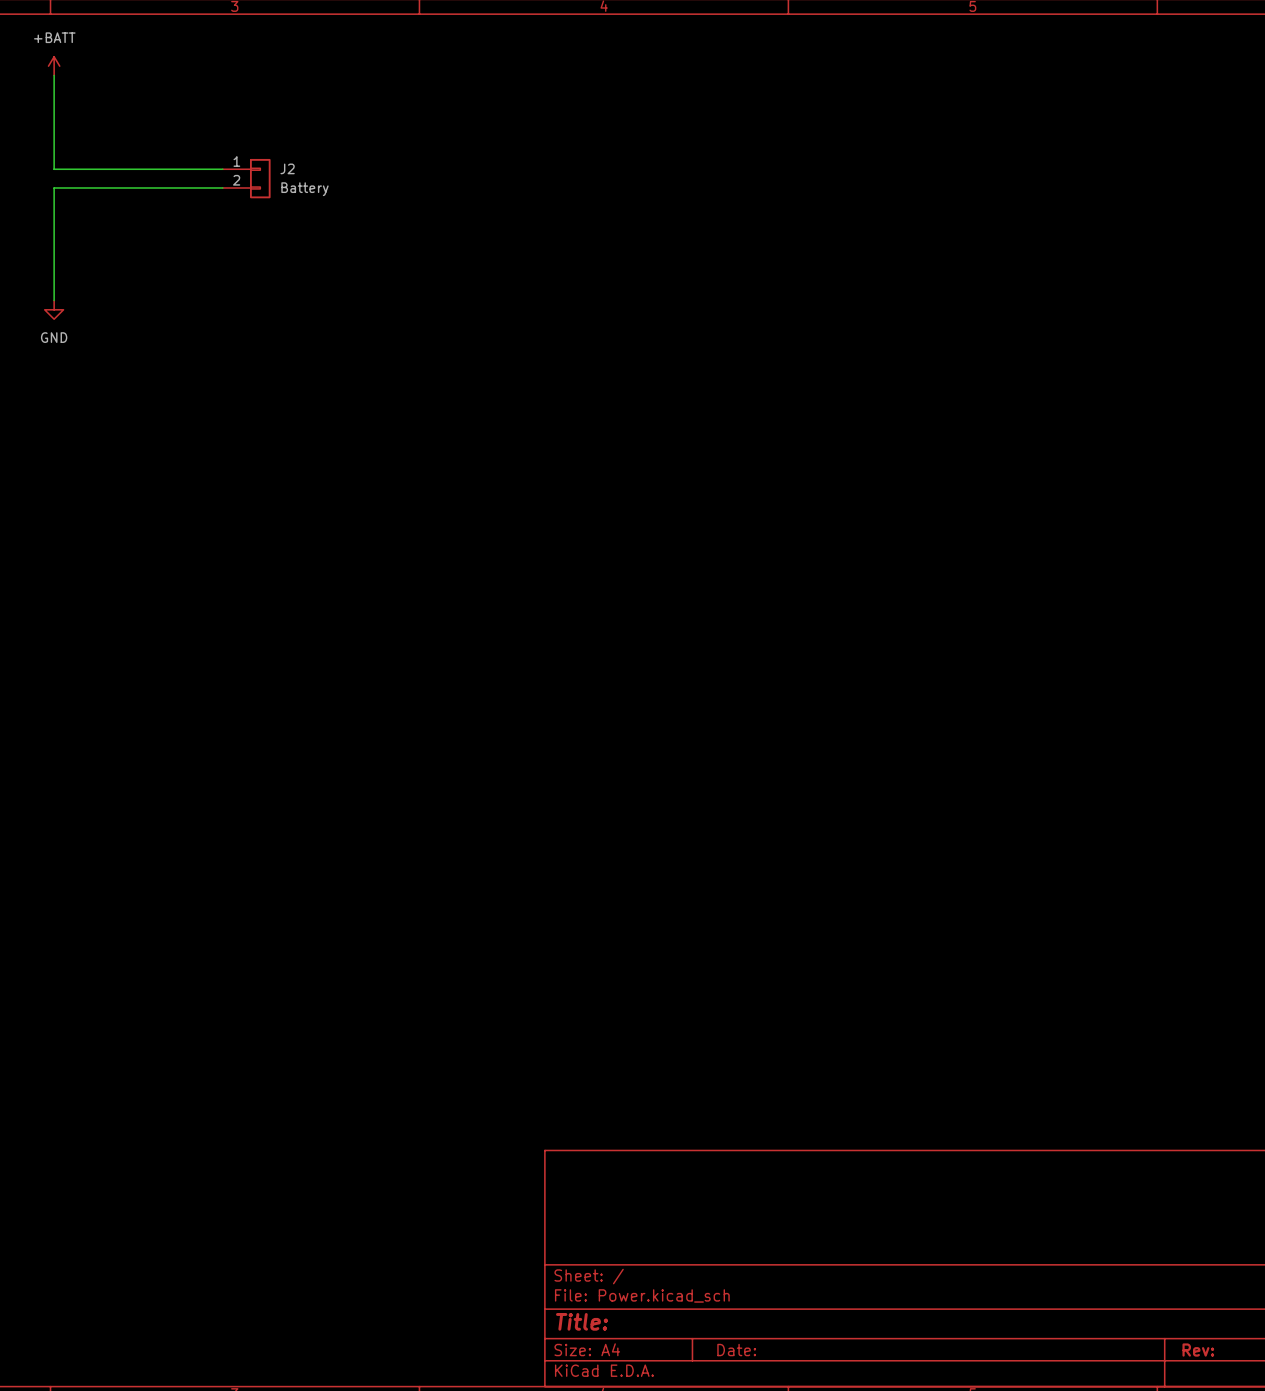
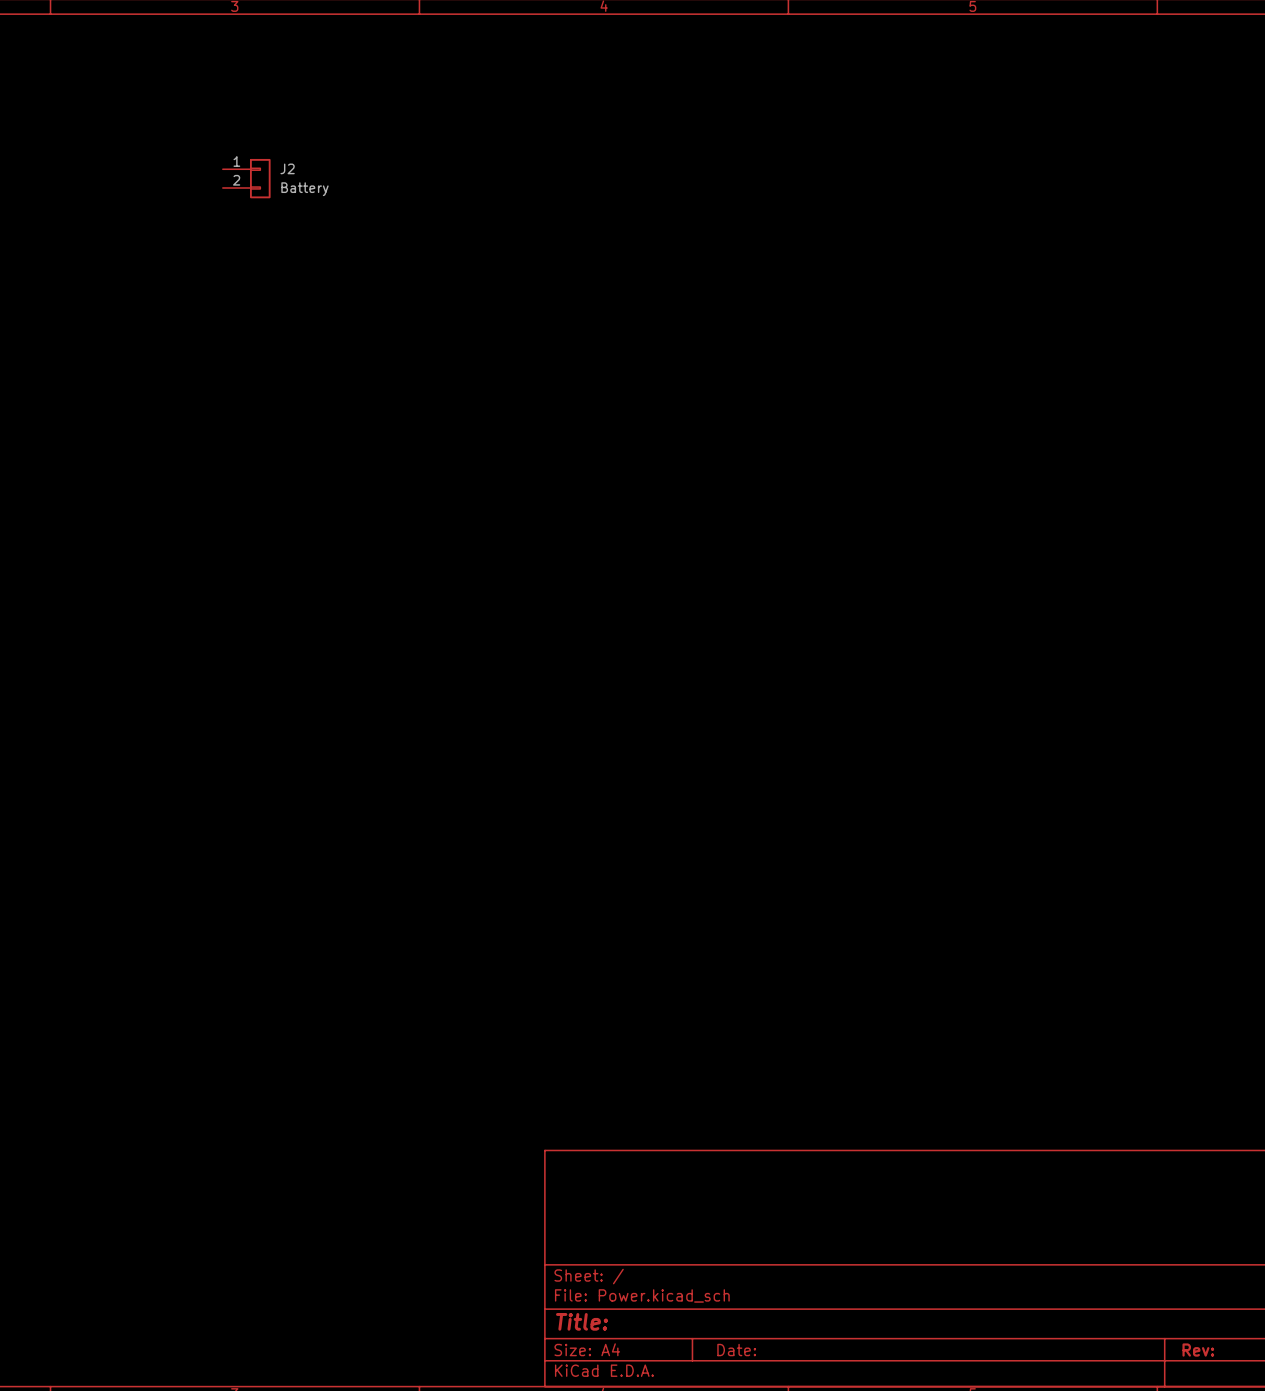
power symbol: +BATT (54, 66) -> none
wire: (54, 75) (54, 169) (222, 169) -> none
wire: (222, 187) (54, 187) (54, 300) -> none
power symbol: GND (54, 309) -> none

